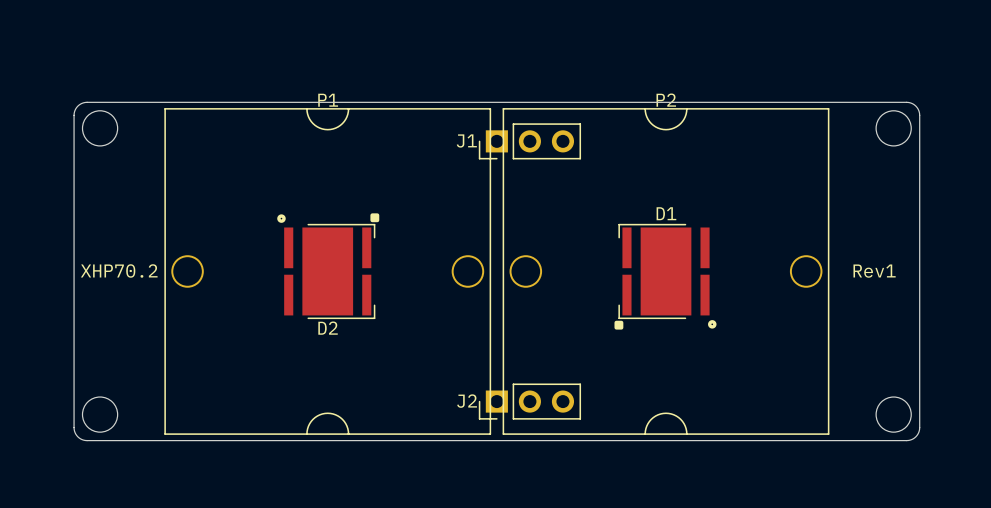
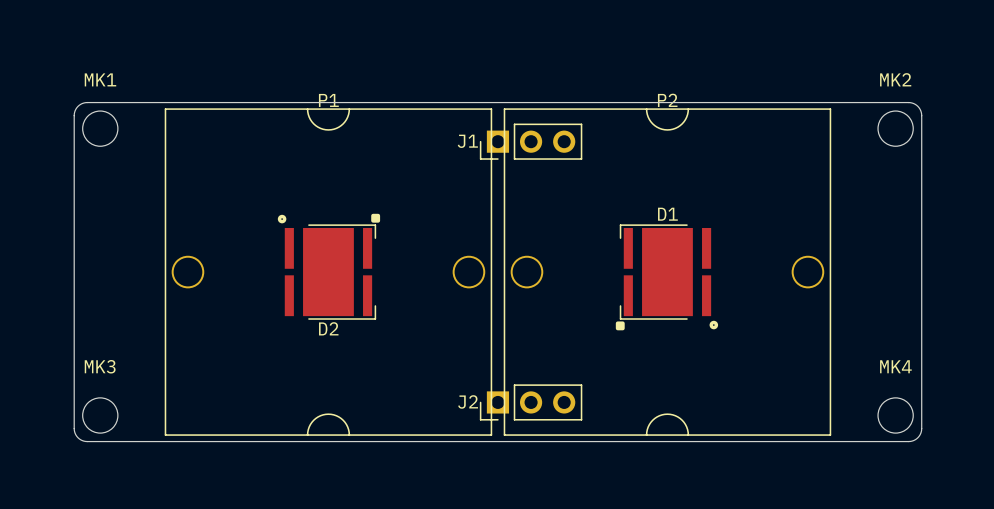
MK1 name: none -> MK1 (100, 79)
MK2 name: none -> MK2 (895, 79)
text: XHP70.2 (119, 270) -> none
text: Rev1 (874, 271) -> none
MK3 name: none -> MK3 (100, 366)
MK4 name: none -> MK4 (895, 366)

